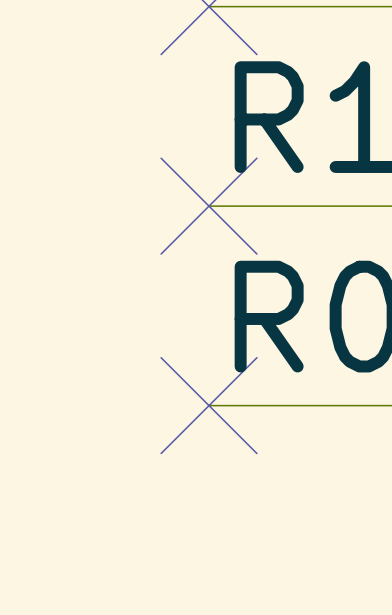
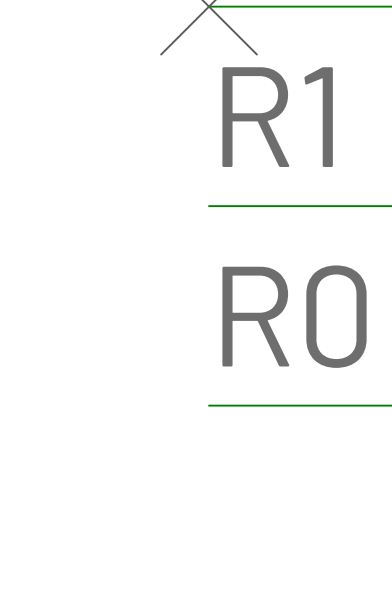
no-connect mark: (209, 206) -> none
no-connect mark: (209, 405) -> none

